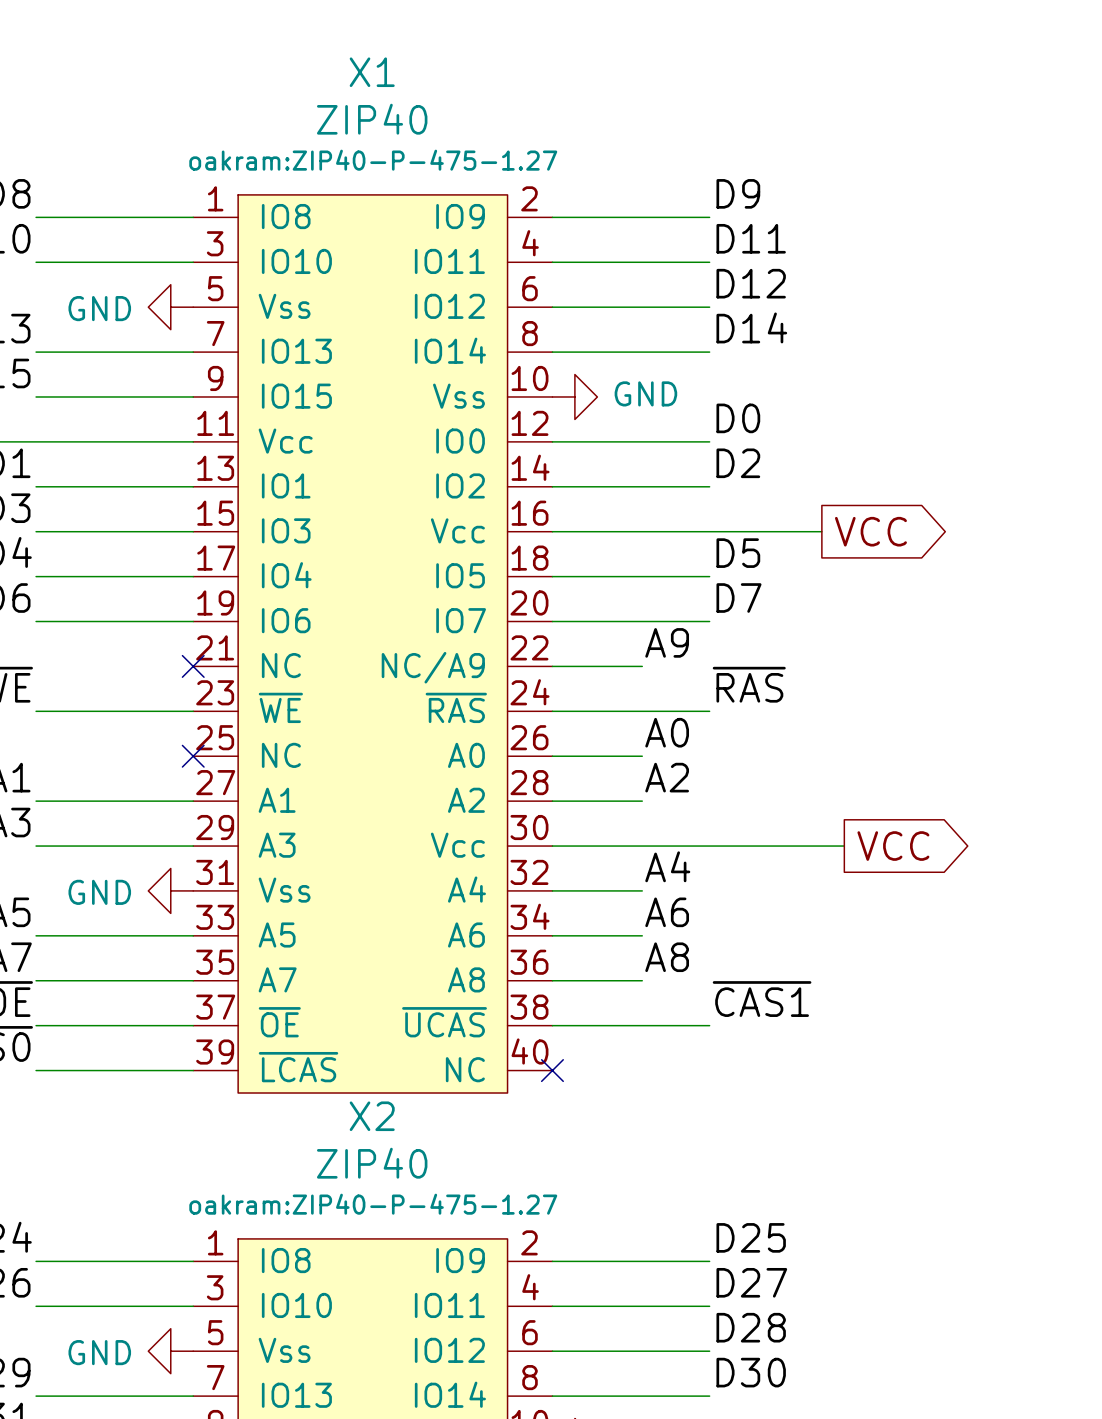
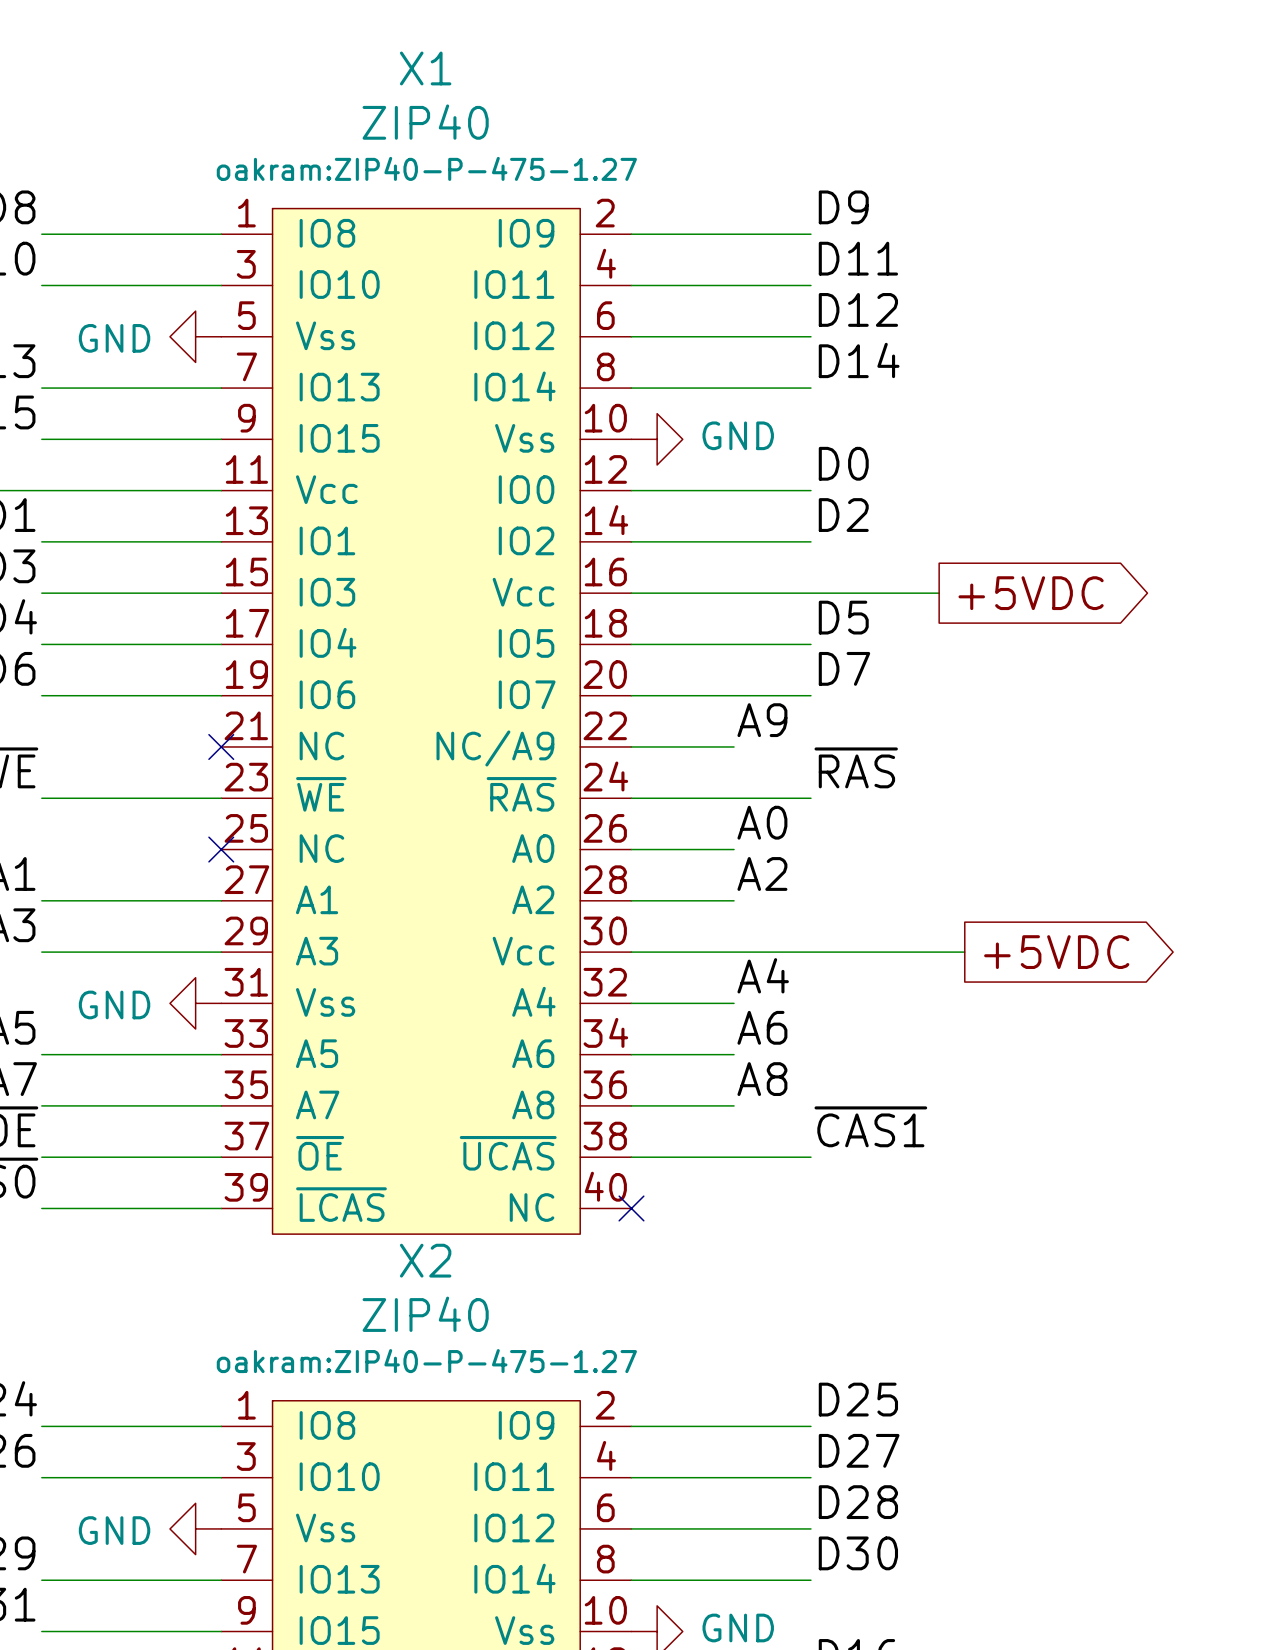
global label: VCC (870, 531) -> +5VDC (1031, 593)
global label: VCC (893, 846) -> +5VDC (1056, 952)

